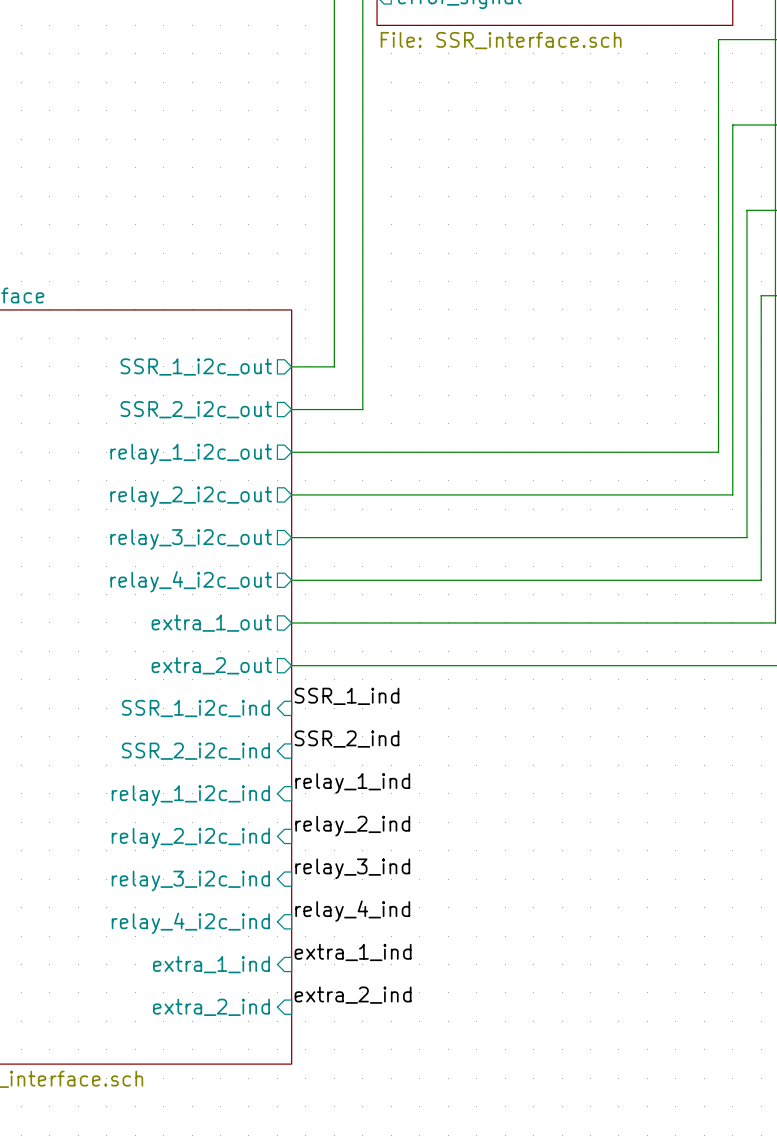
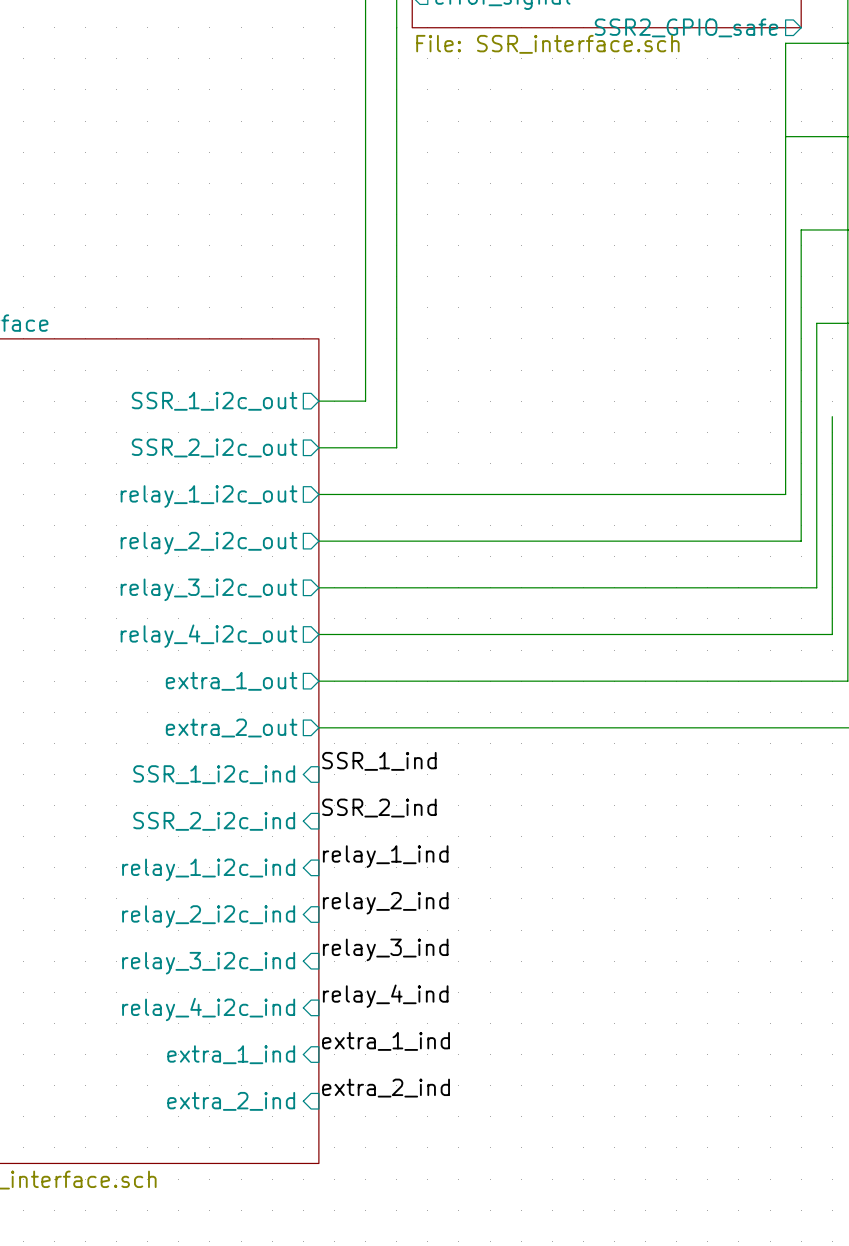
sheet pin: none -> SSR2_GPIO_safe (686, 27)
wire: (732, 124) (732, 210) -> (801, 136) (785, 136)
wire: (746, 210) (746, 295) -> (816, 229) (801, 229)
wire: (761, 295) (761, 381) -> (832, 323) (816, 323)

